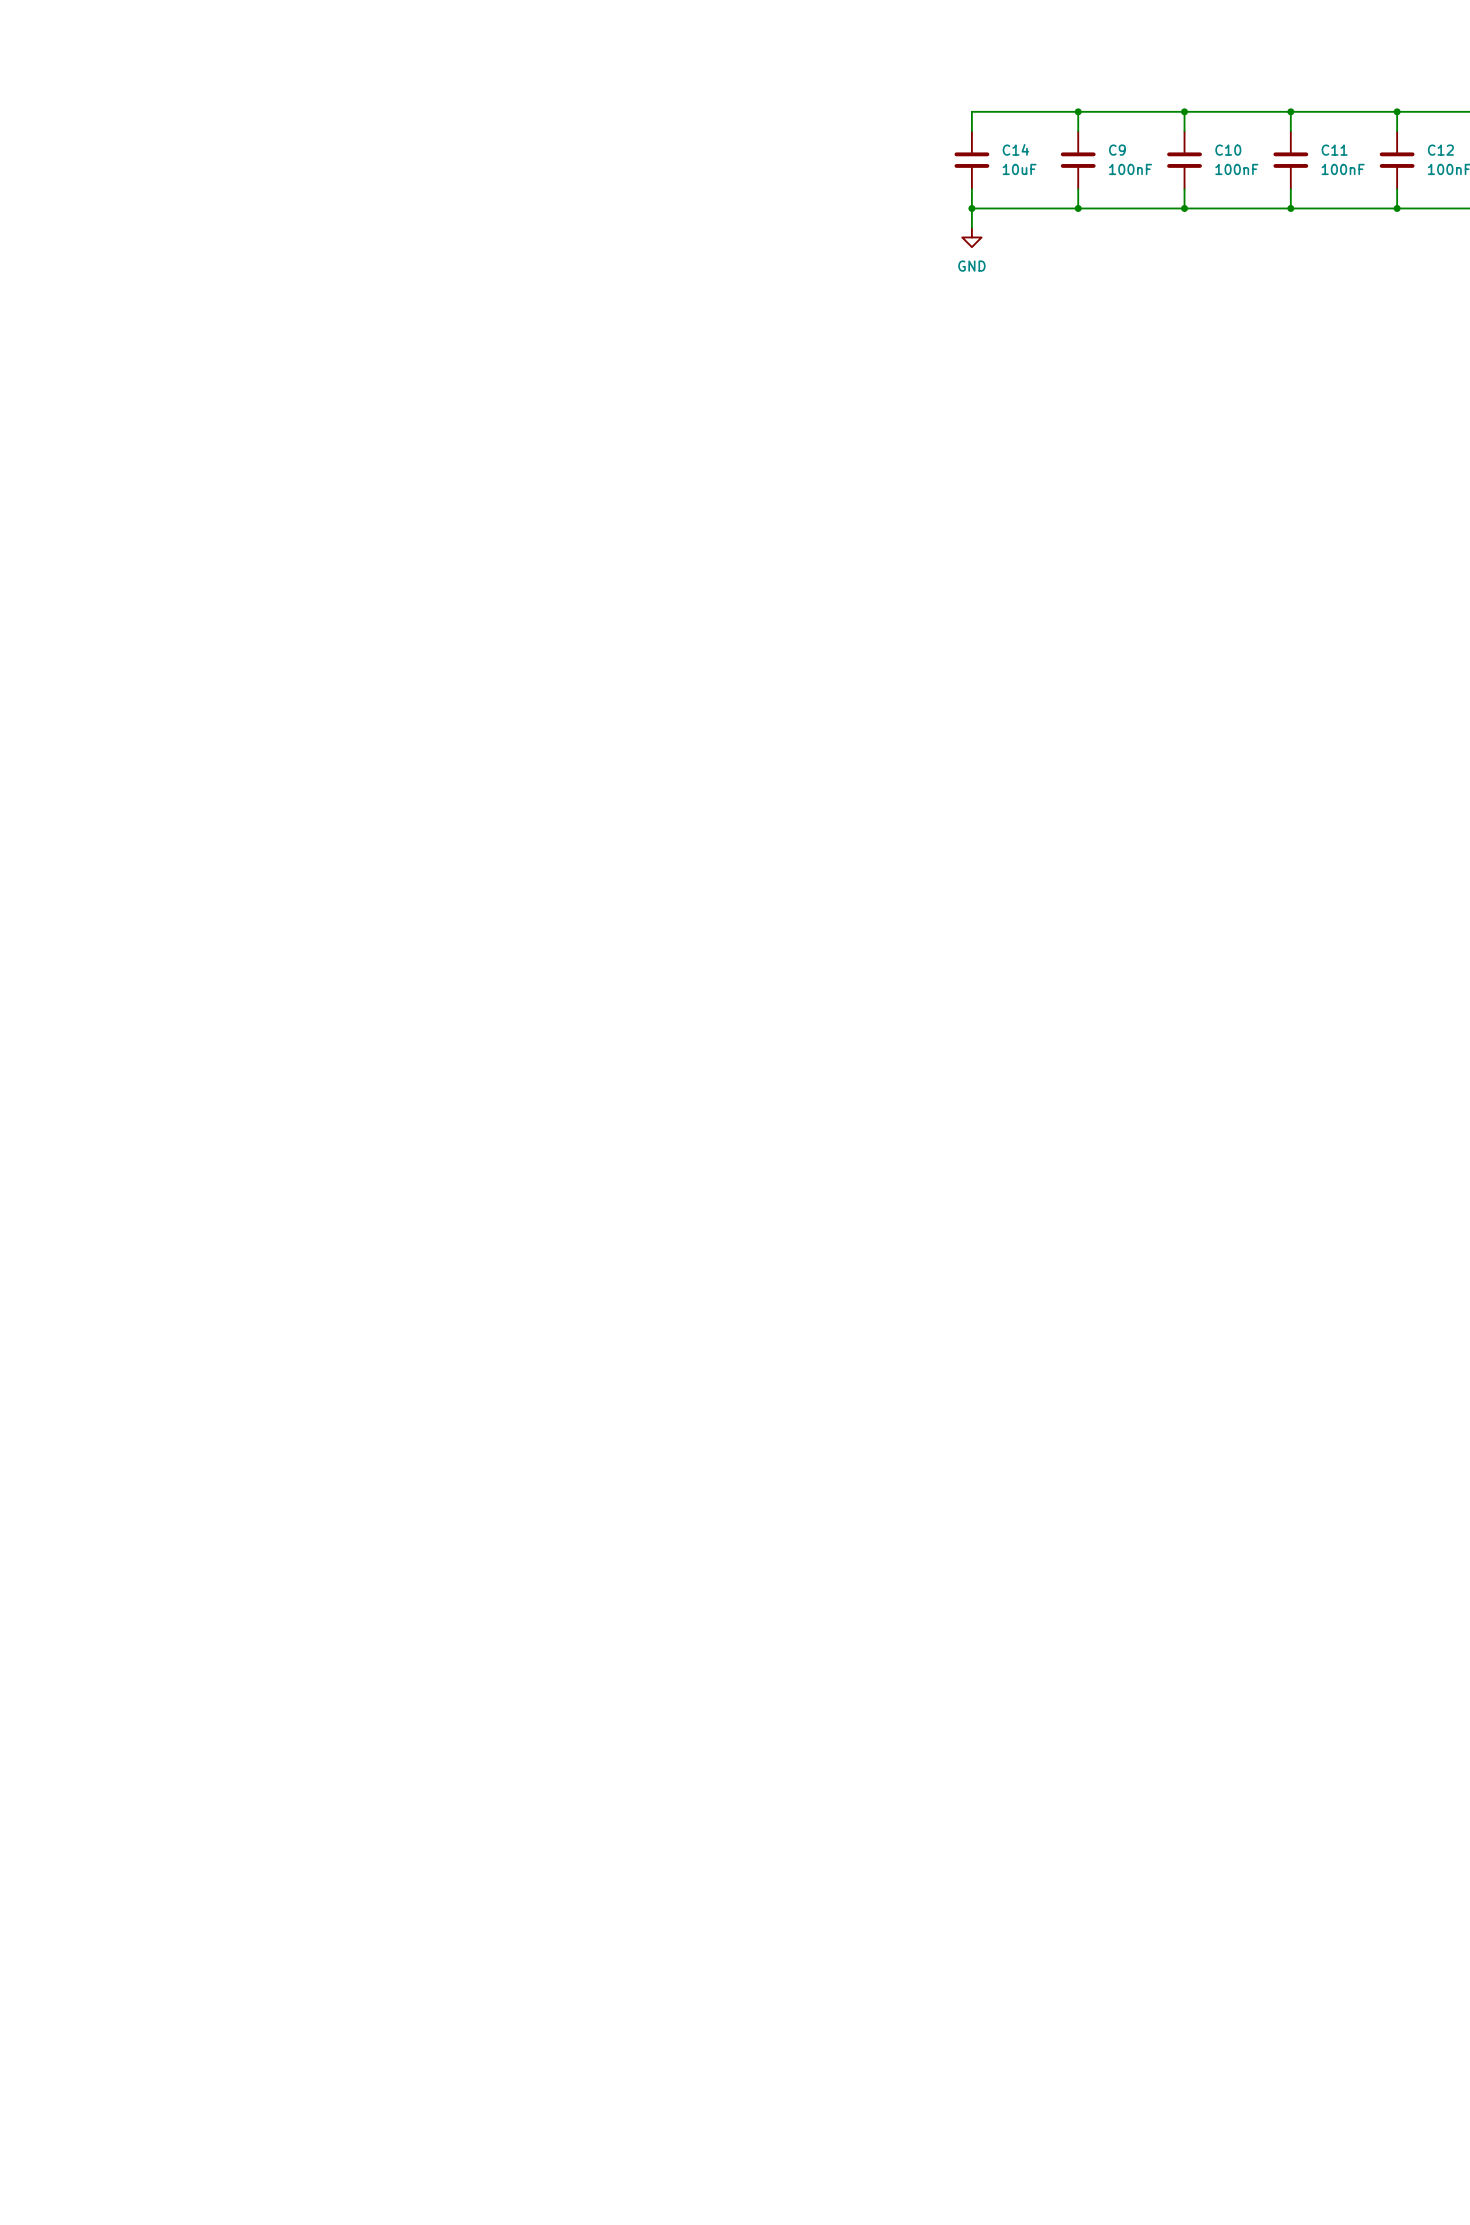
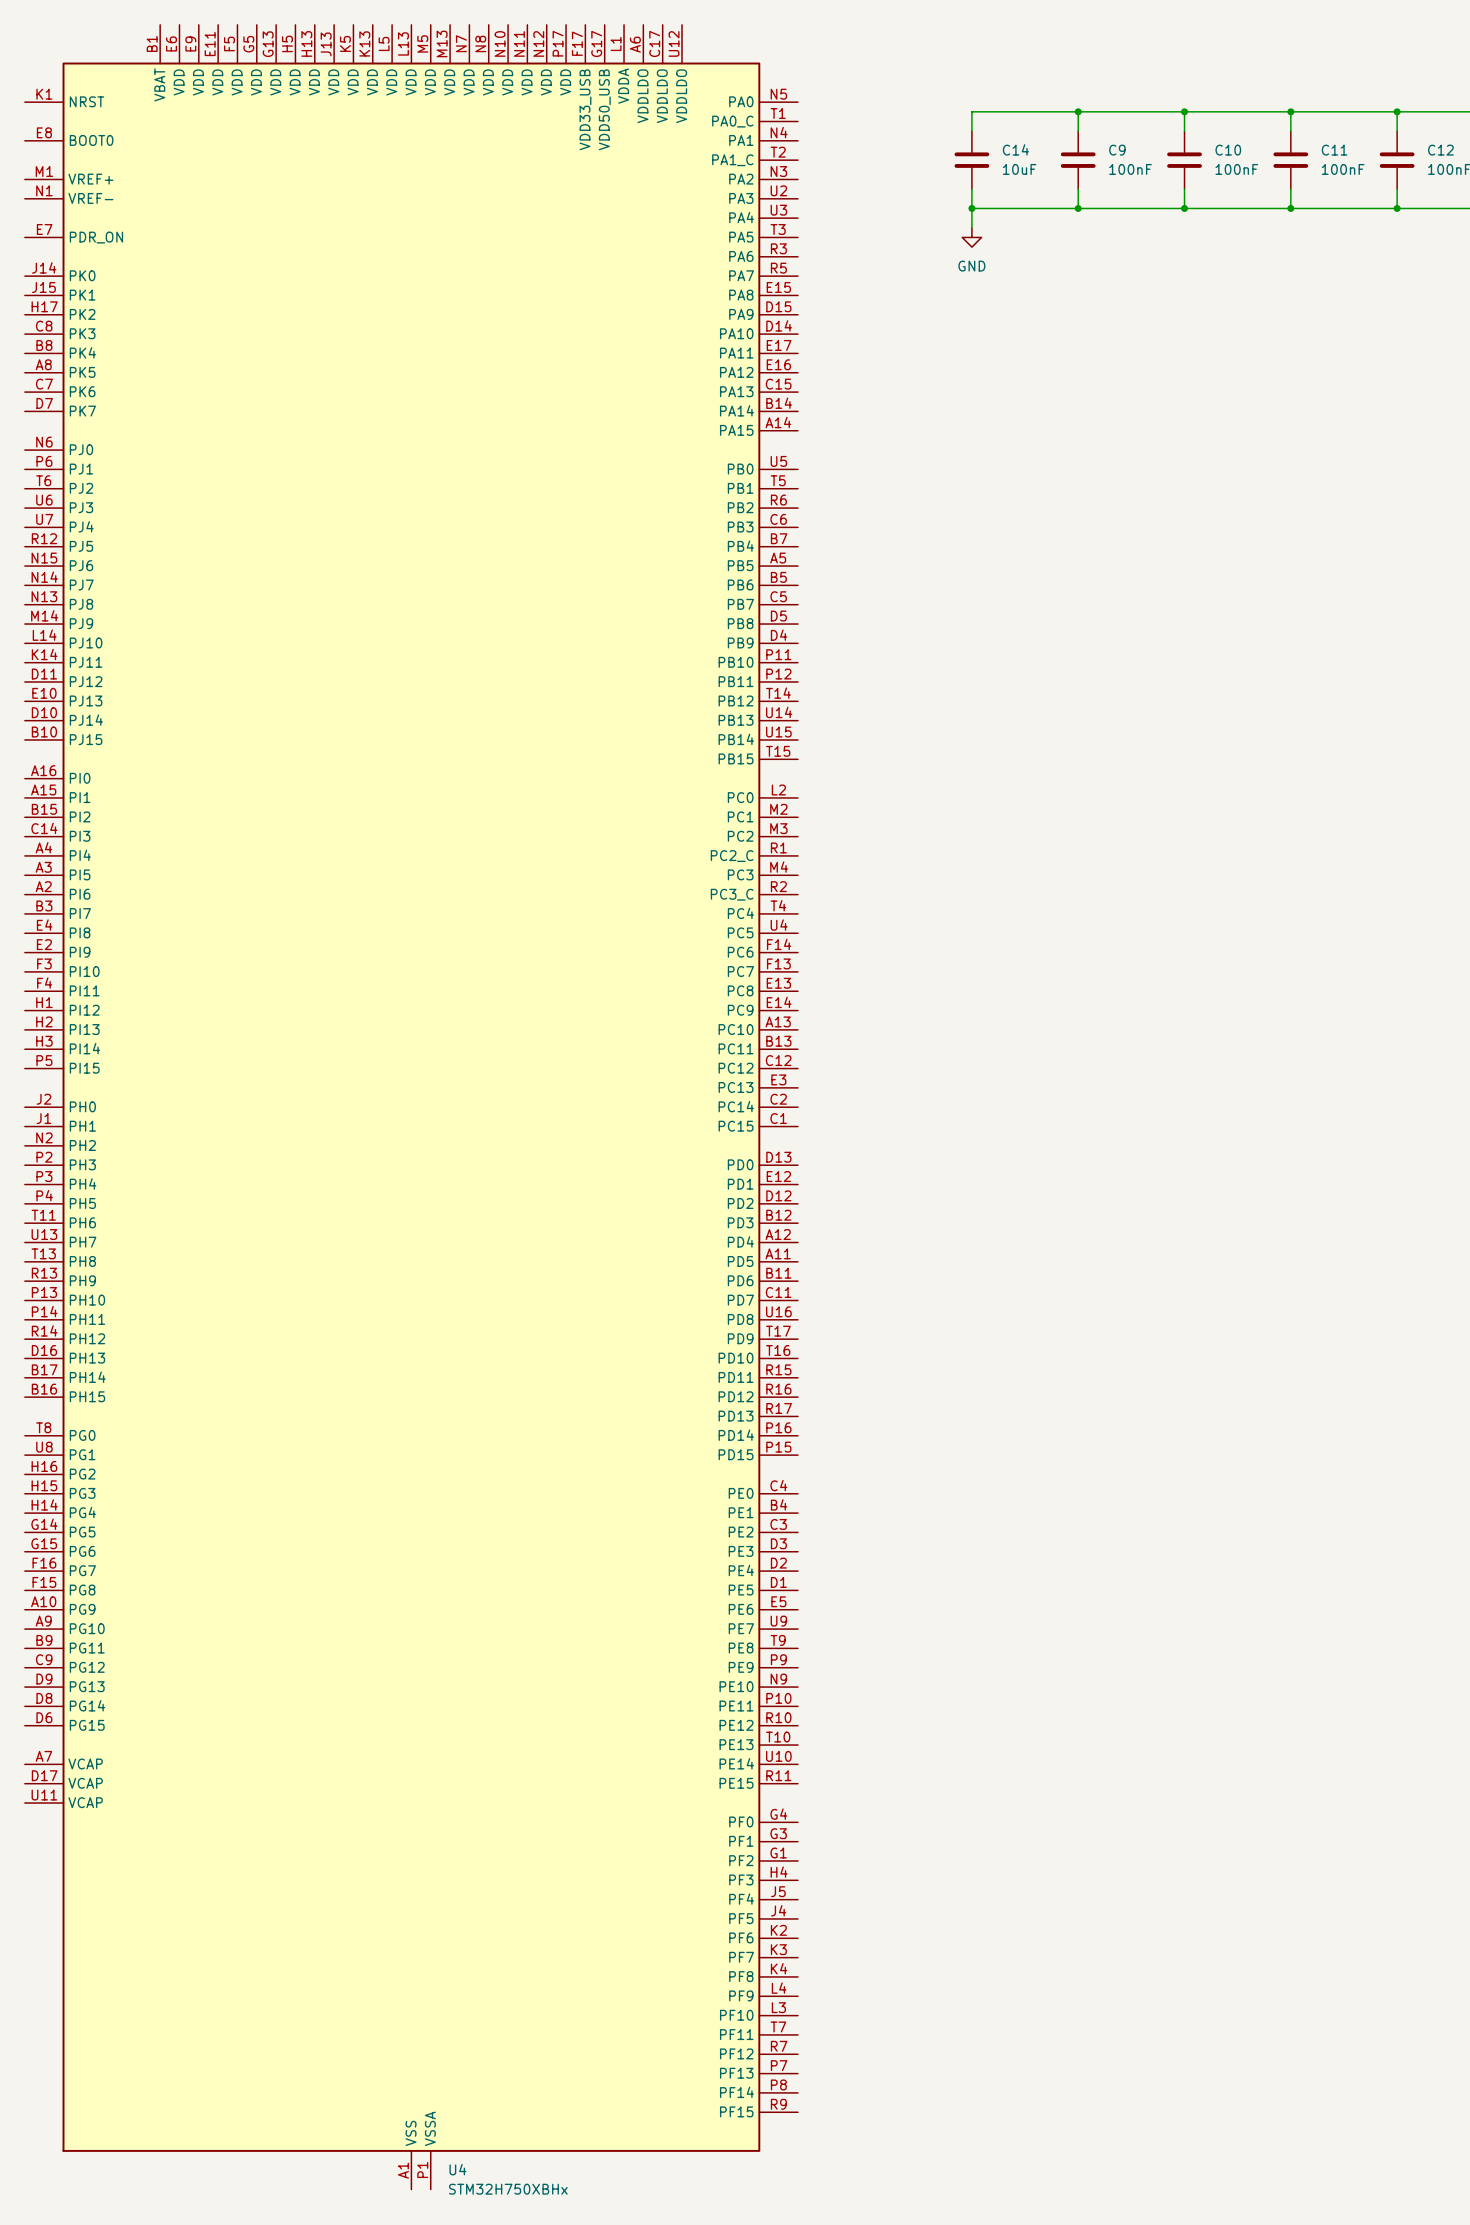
U4: none -> STM32H750XBHx (411, 1107)

